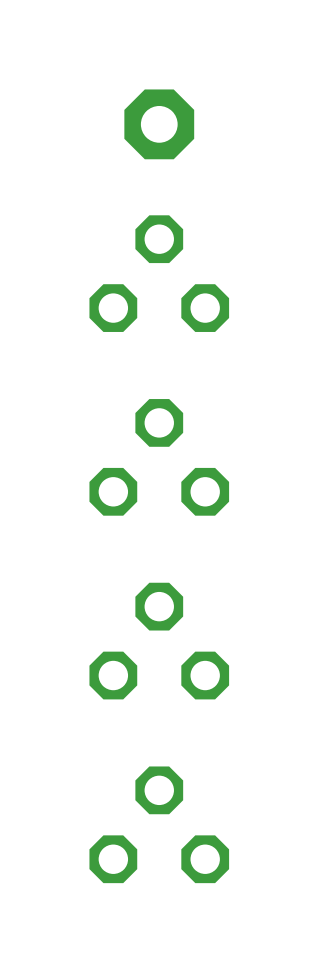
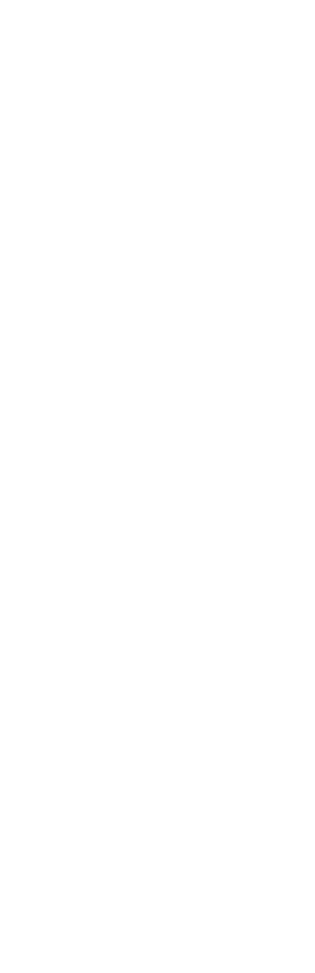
part: (159, 124) -> none
part: (159, 273) -> none
part: (159, 457) -> none
part: (159, 641) -> none
part: (159, 824) -> none

